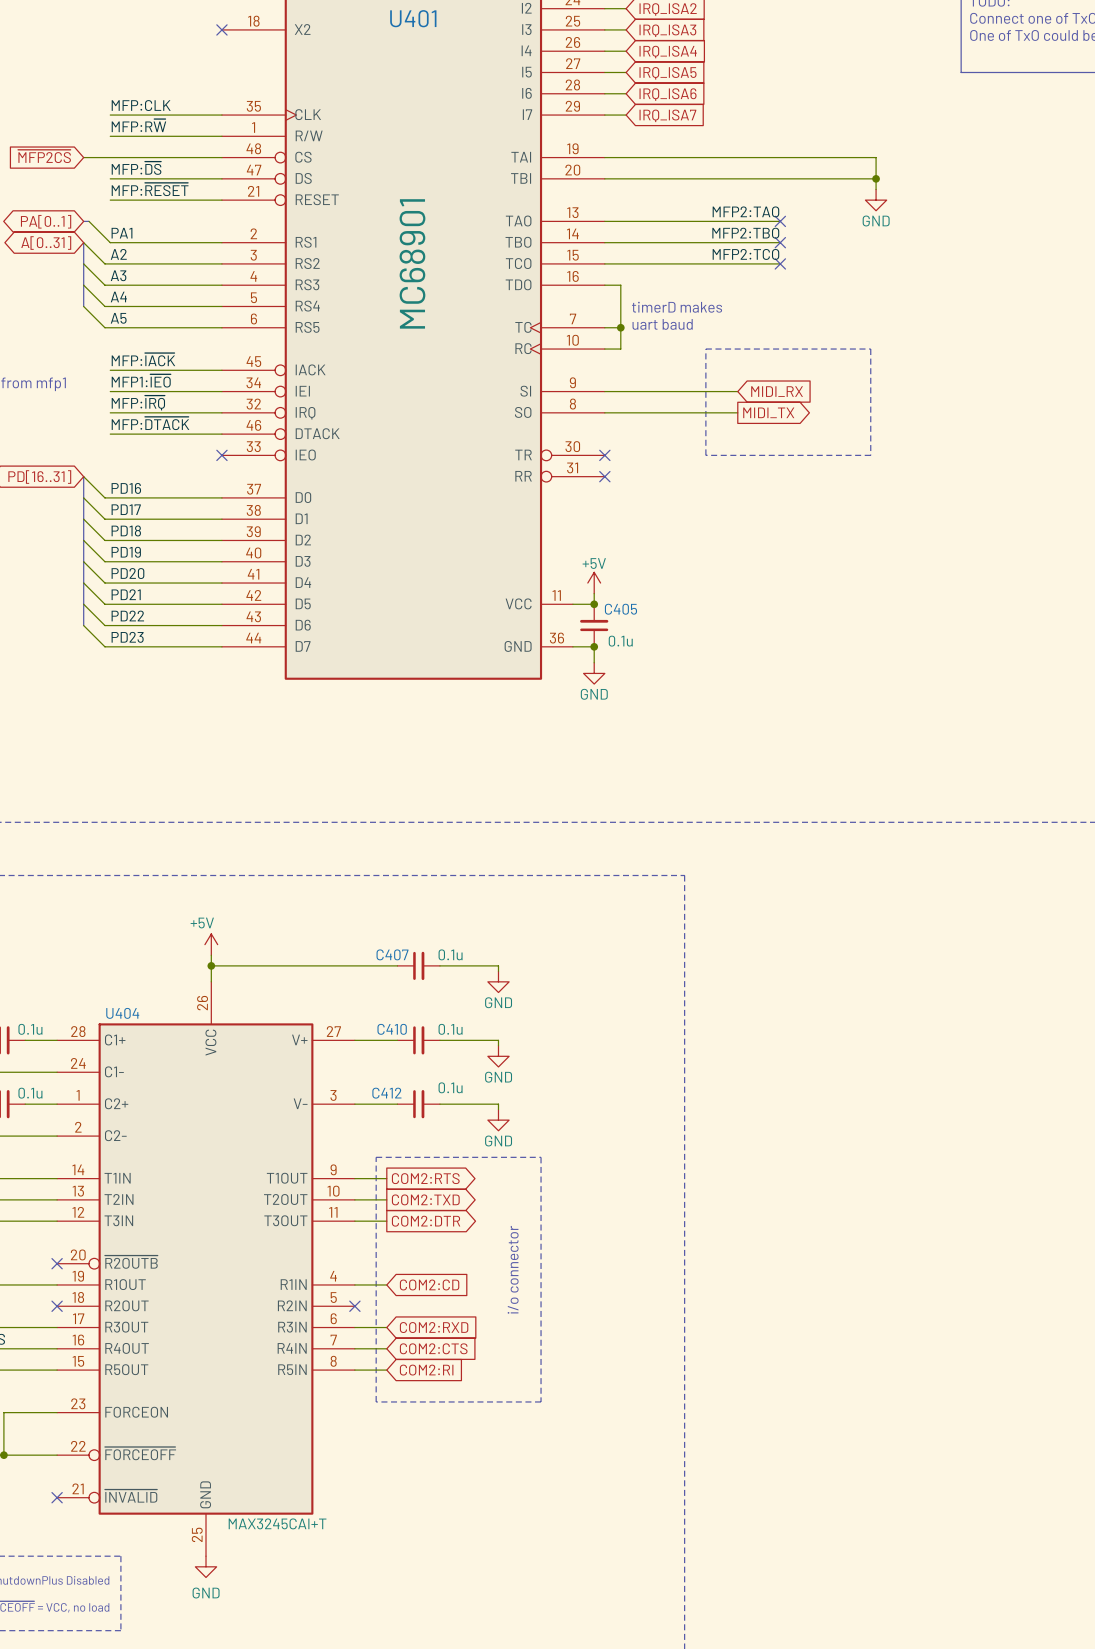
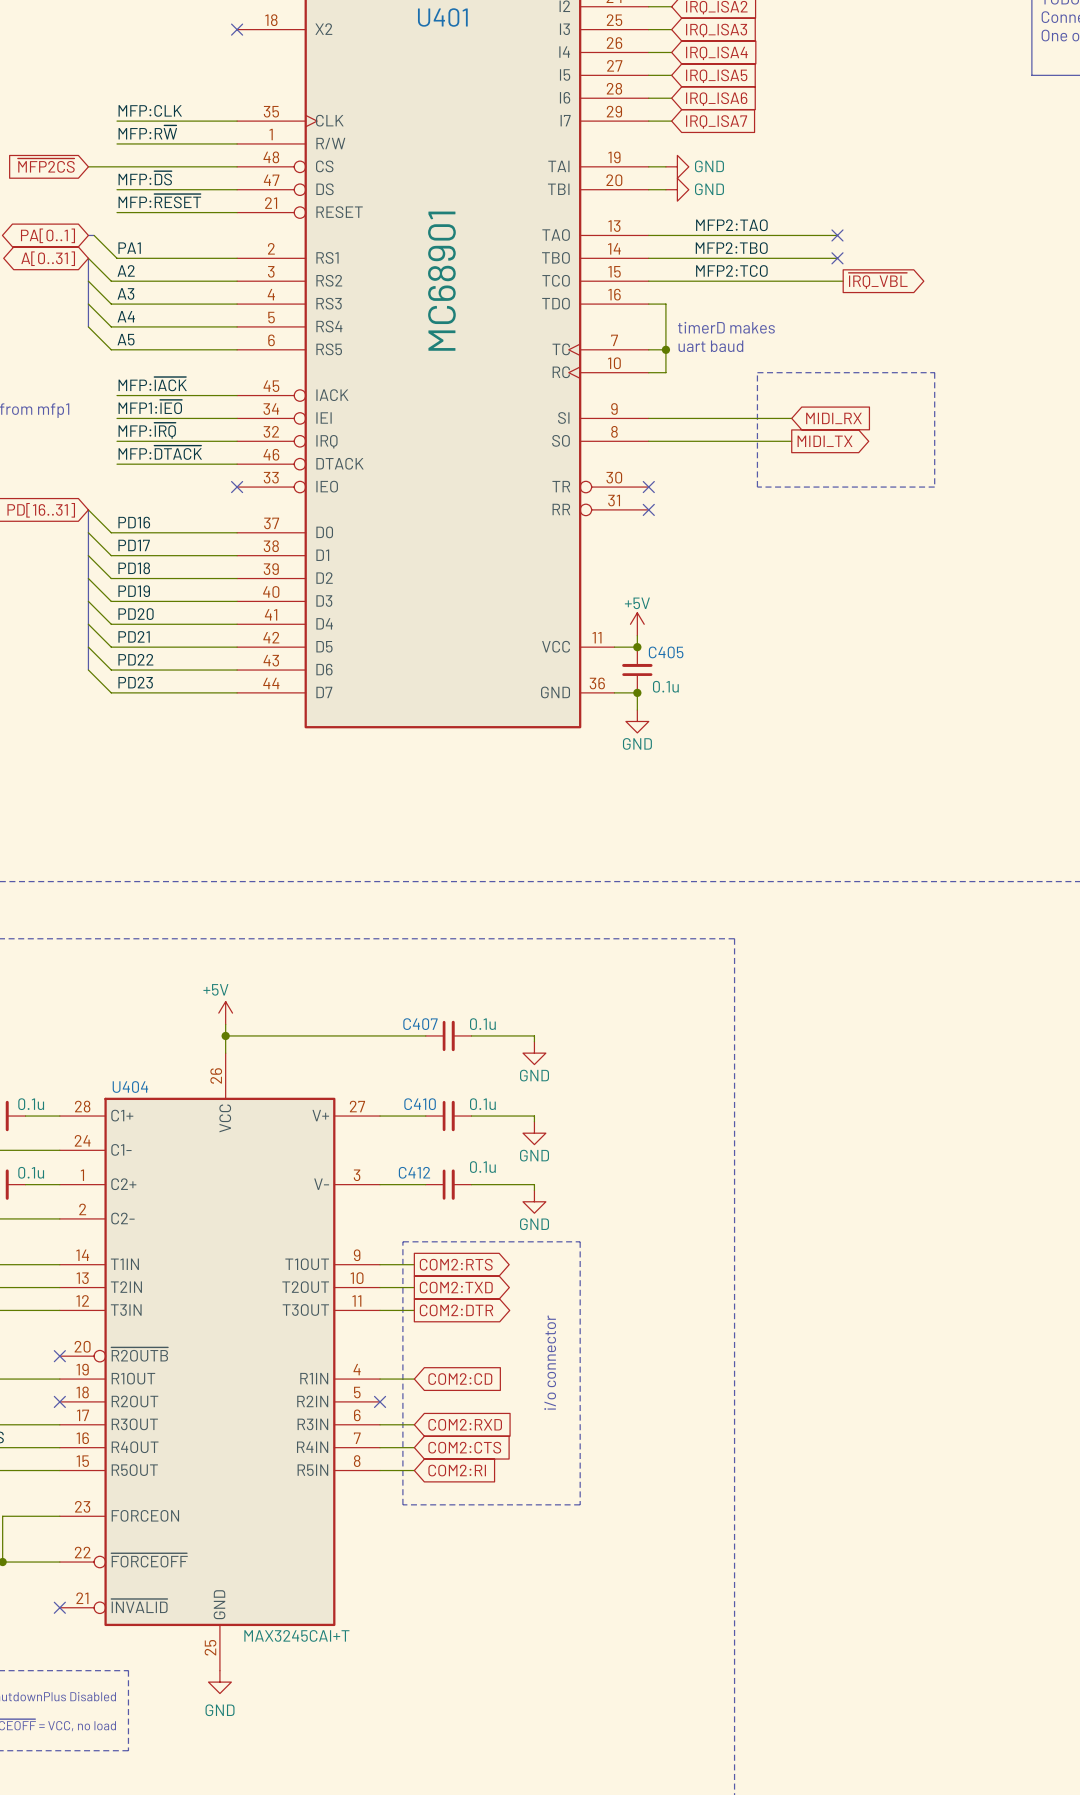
wire: (620, 157) (876, 157) (876, 189) -> none
power symbol: none -> GND (677, 166)
wire: (620, 178) (876, 178) -> none
power symbol: none -> GND (677, 189)
junction: (876, 178) -> none
power symbol: GND (876, 200) -> none
label position: MFP2:TAO (745, 211) -> MFP2:TAO (731, 225)
label position: MFP2:TBO (745, 233) -> MFP2:TBO (731, 248)
label position: MFP2:TCO (745, 254) -> MFP2:TCO (731, 271)
wire: none -> (837, 281) (843, 281)
no-connect mark: (780, 263) -> none
global label: none -> ~{IRQ_VBL} (878, 280)

